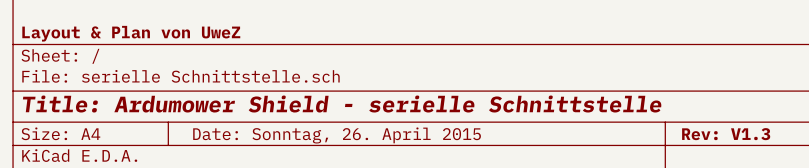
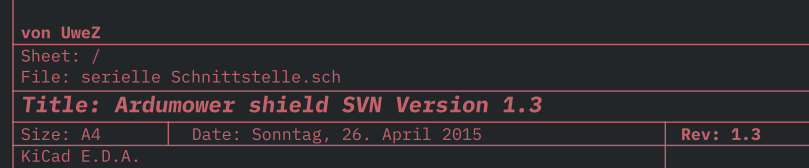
title block: Layout & Plan von UweZ (131, 33) -> von UweZ (60, 32)
title block: Title: Ardumower Shield - serielle Schnittstelle (342, 104) -> Title: Ardumower shield SVN Version 1.3 (282, 104)
title block: Rev: V1.3 (726, 134) -> Rev: 1.3 (721, 134)

